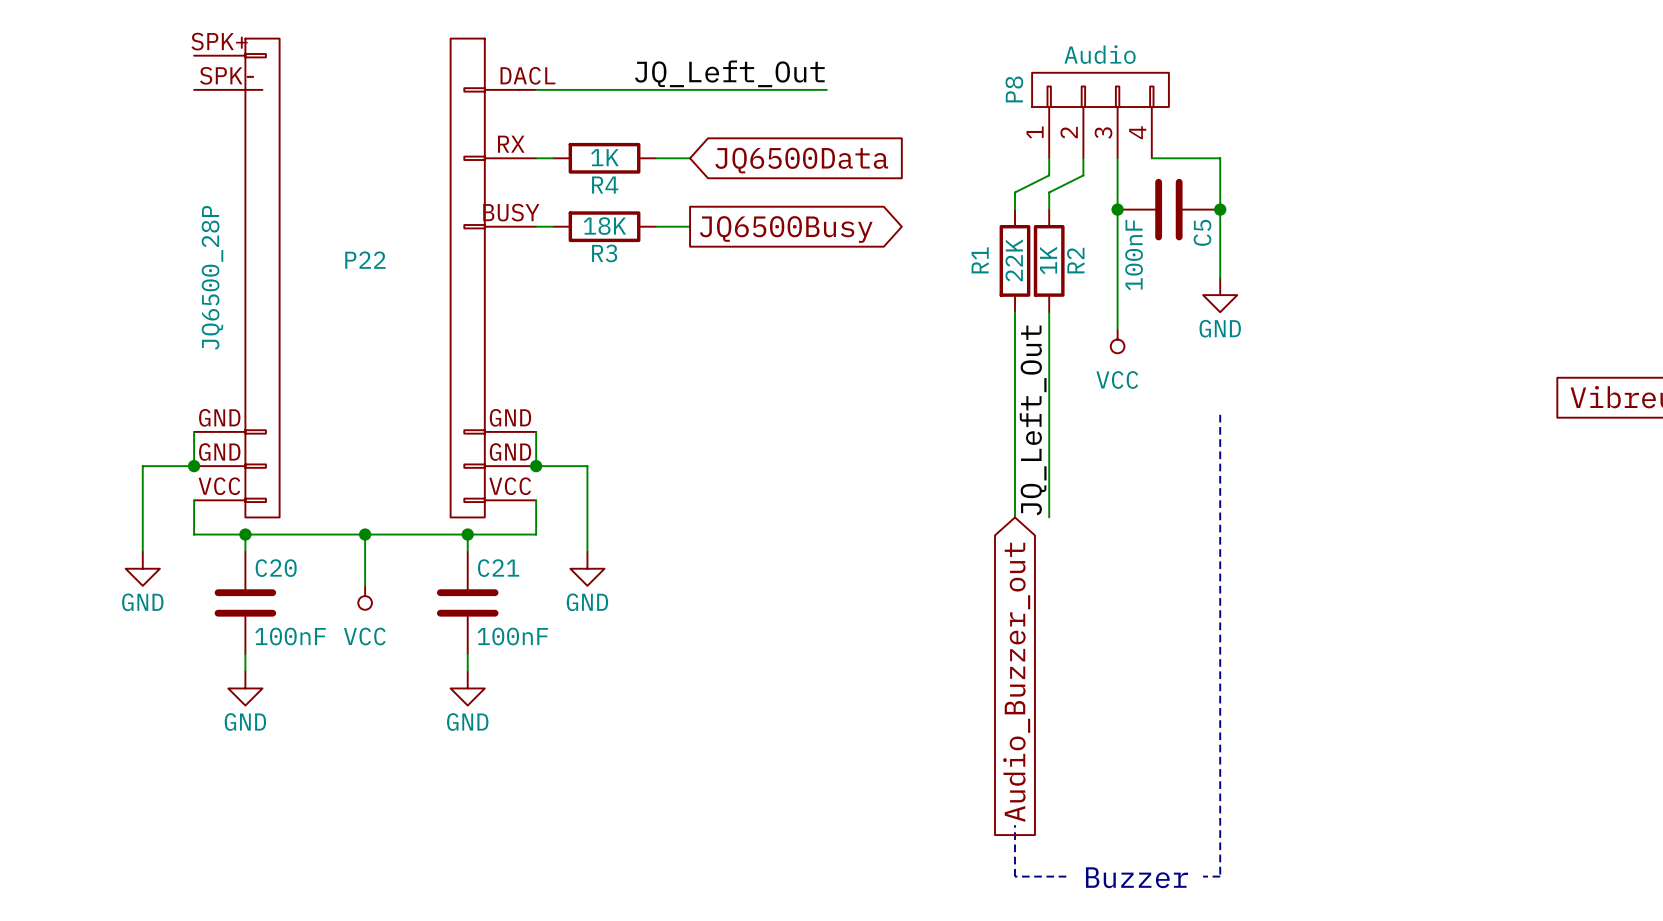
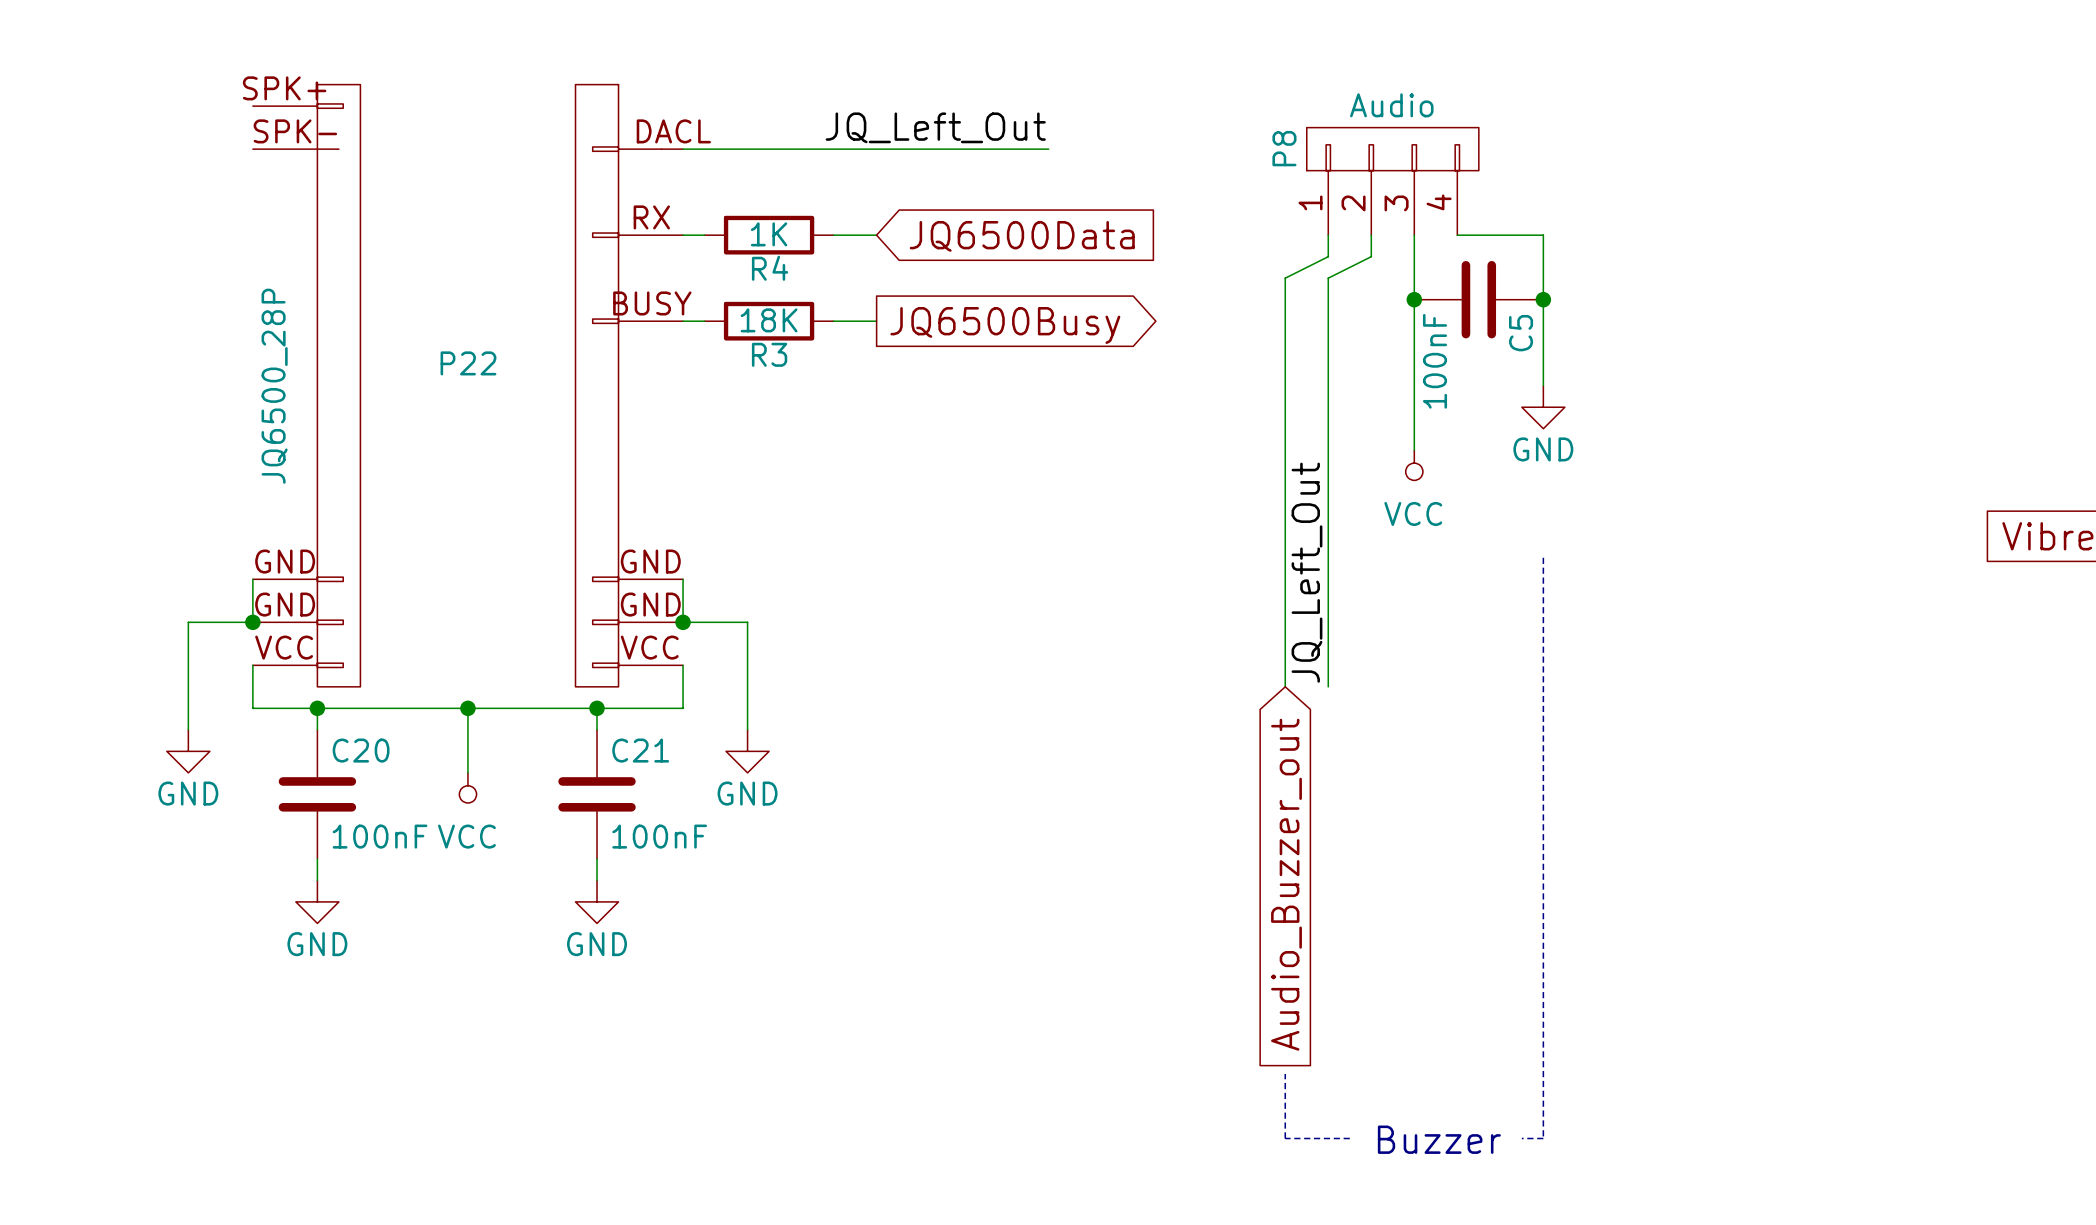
wire: none -> (1285, 299) (1285, 428)
wire: none -> (1328, 299) (1328, 428)
R1: 22K (1014, 260) -> none
R2: 1K (1049, 260) -> none

